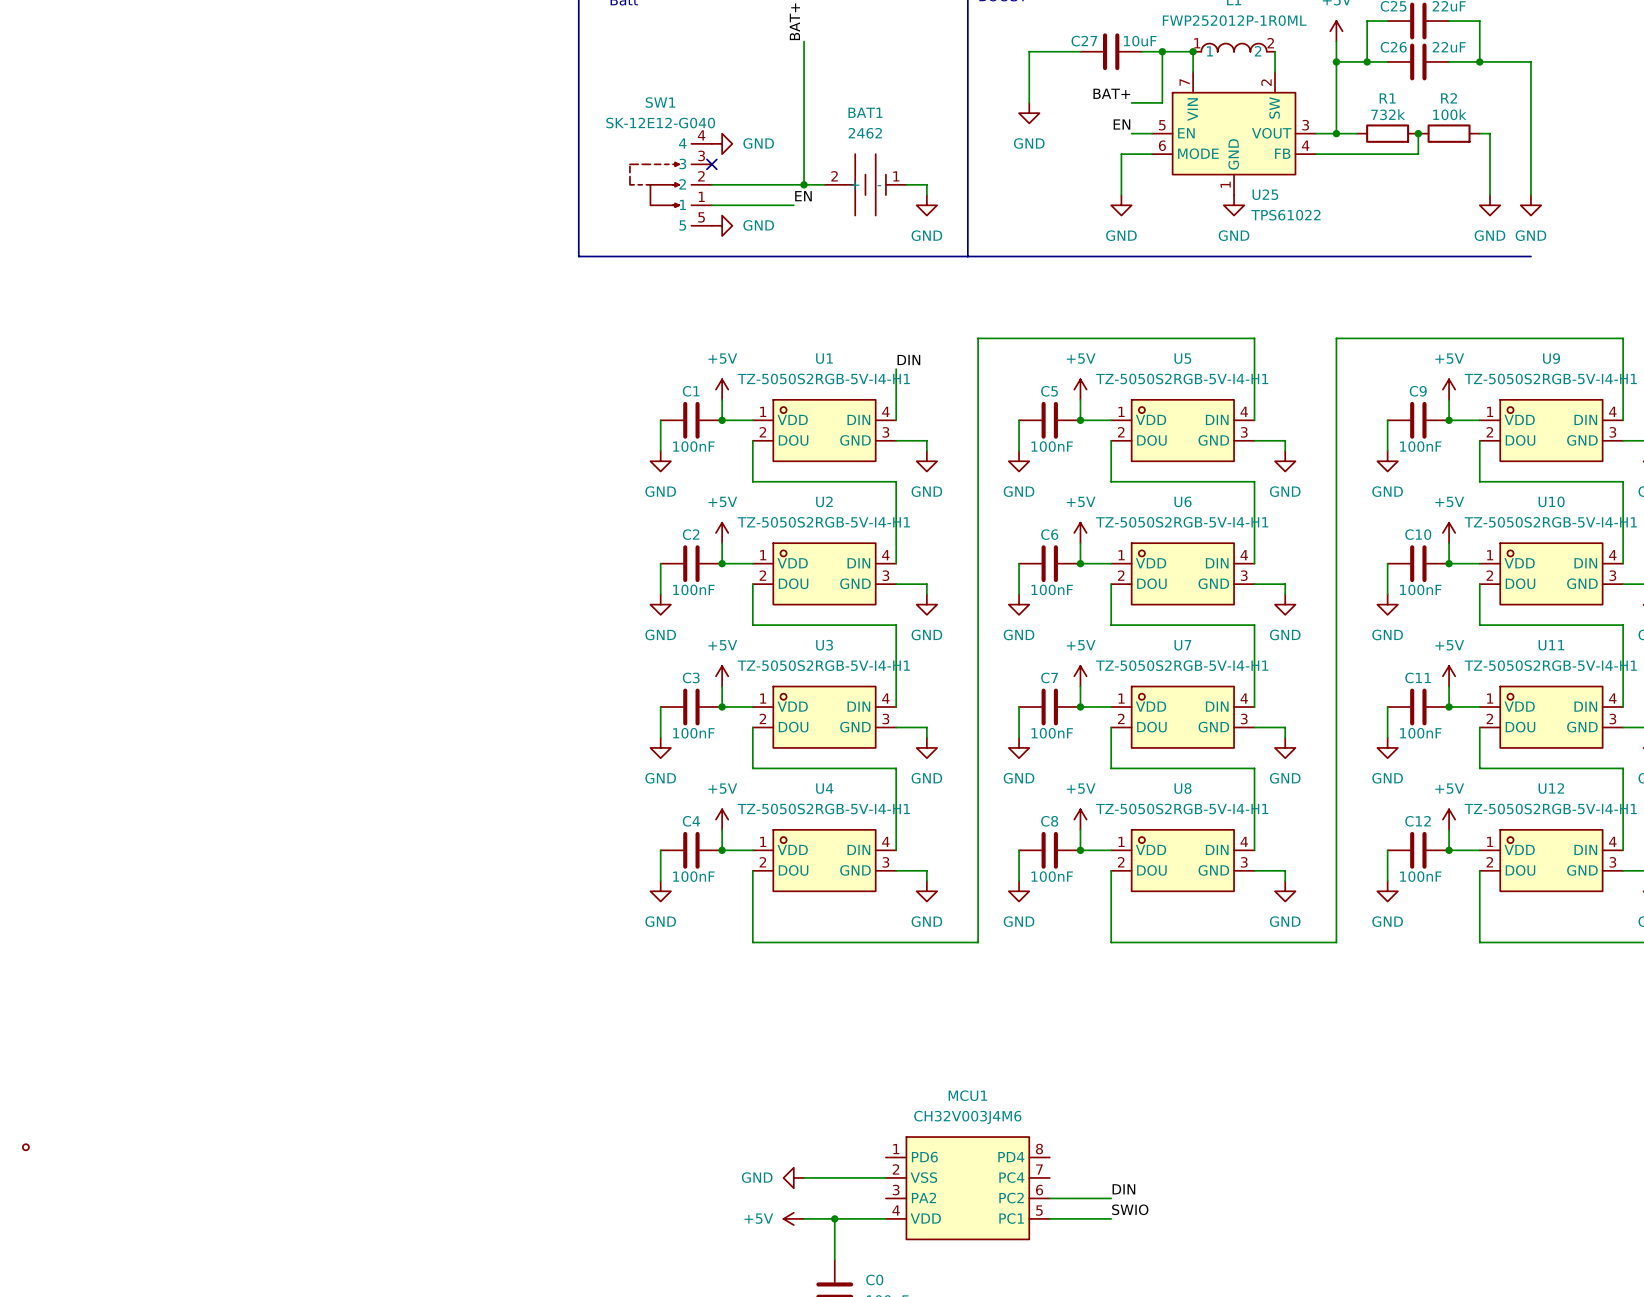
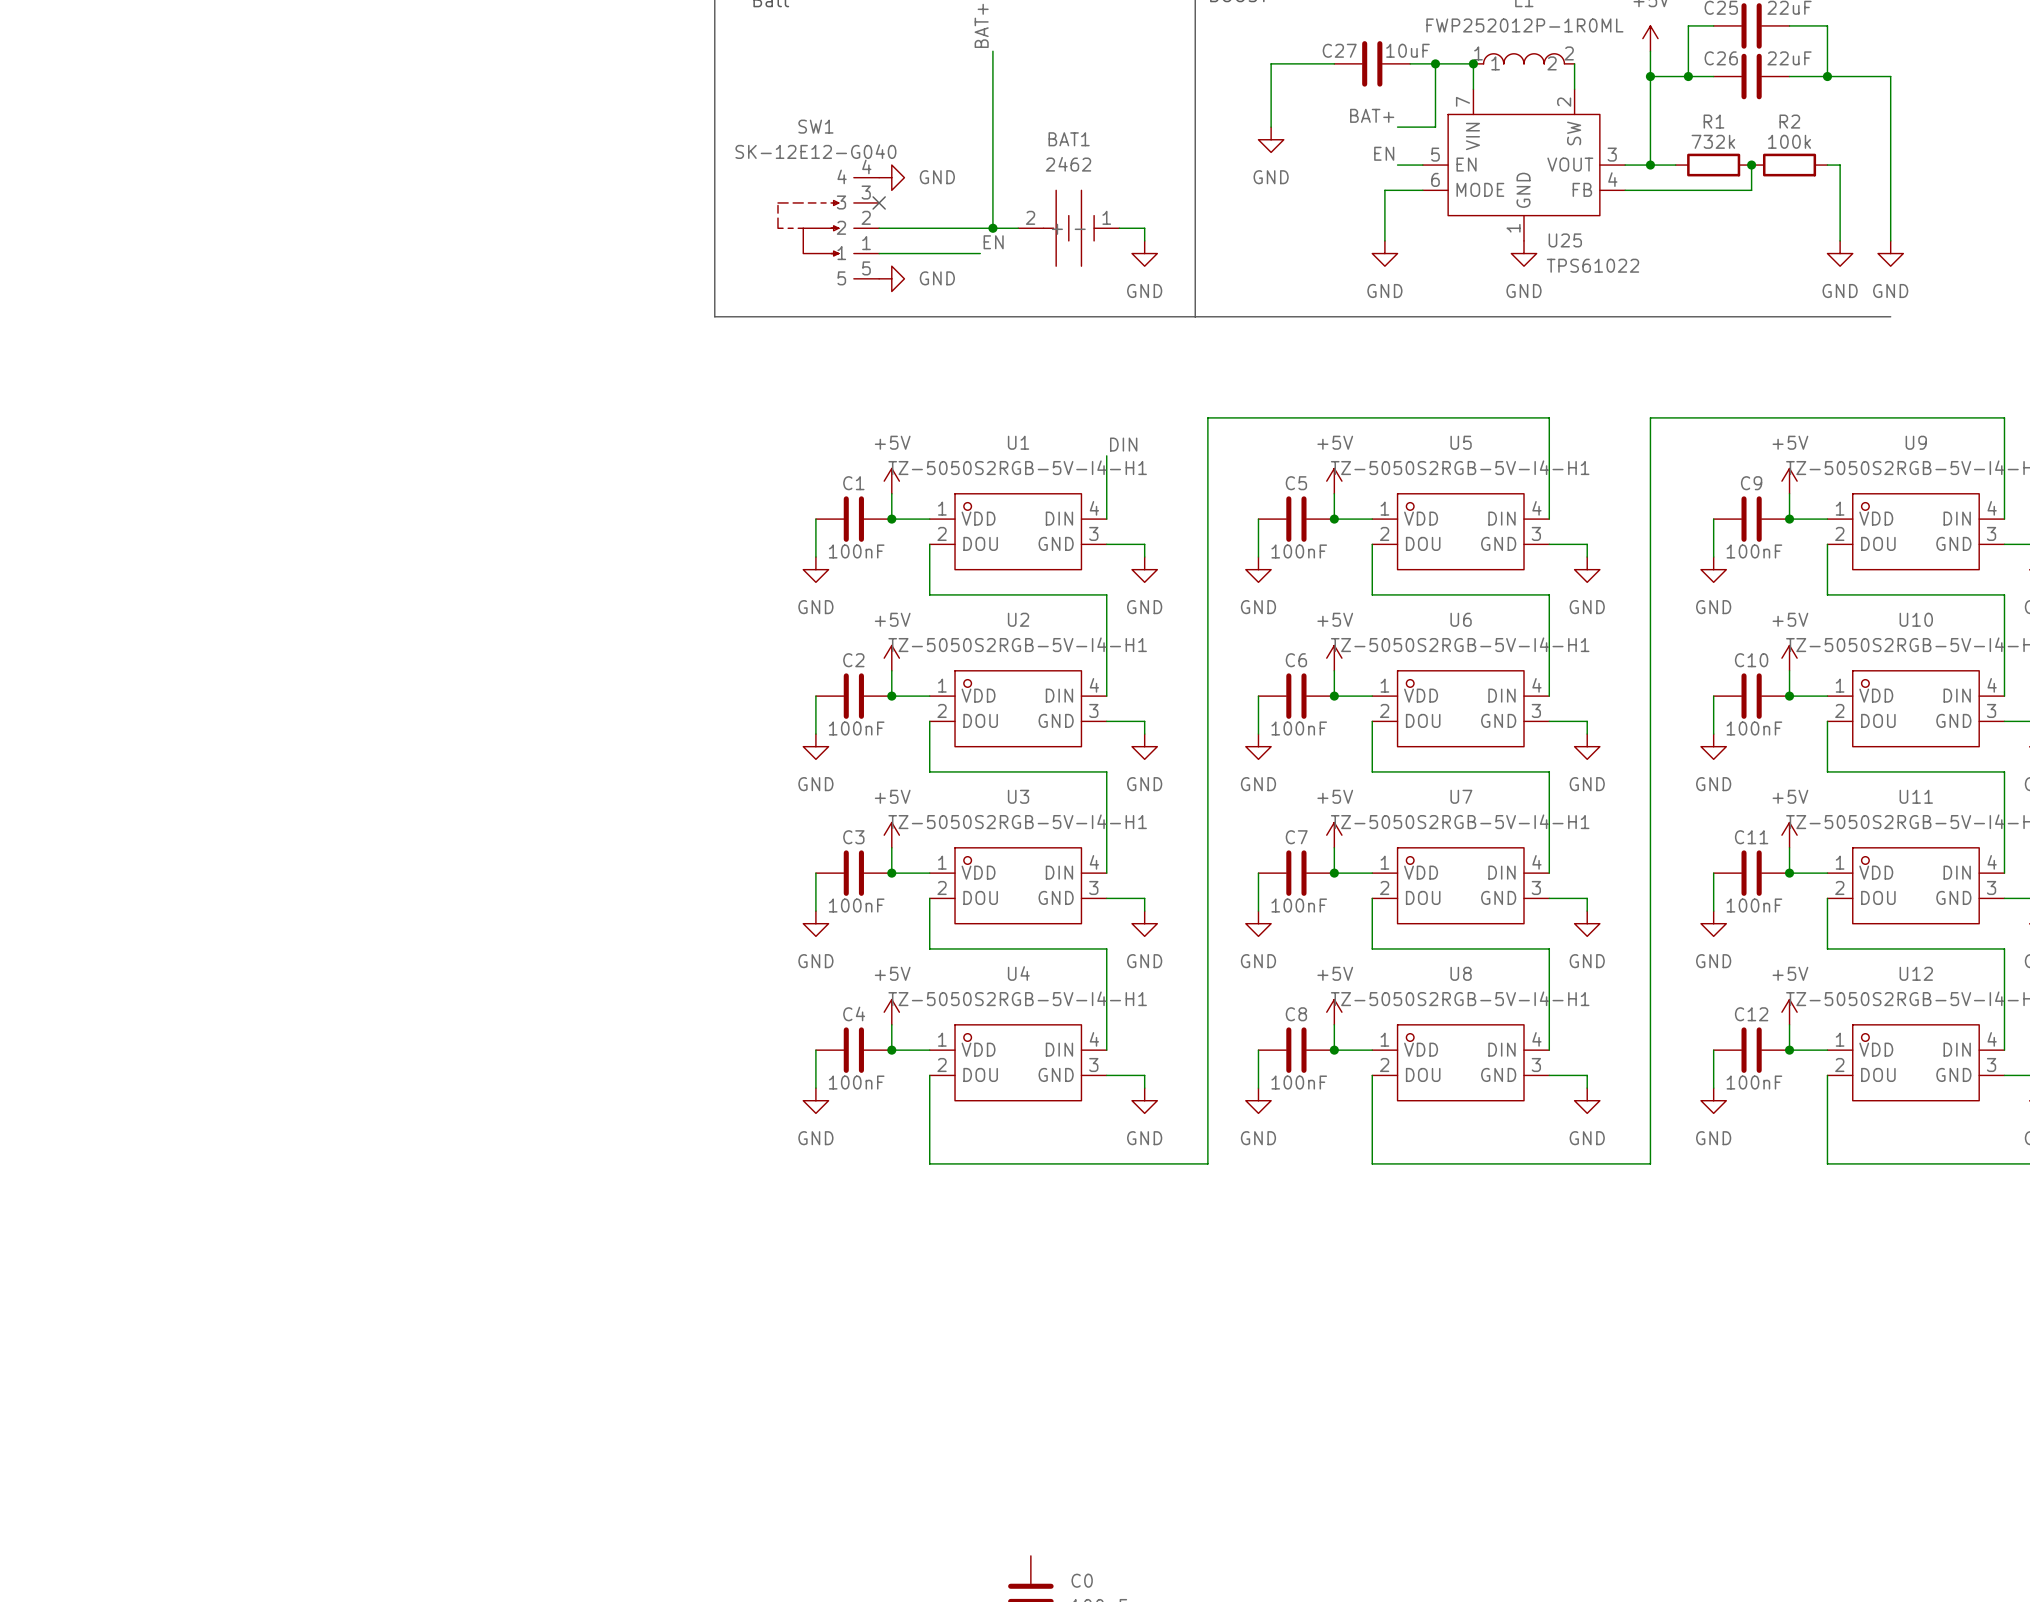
power symbol: GND (793, 1177) -> none
wire: (804, 1177) (885, 1177) -> none
MCU1: CH32V003J4M6 (536, 1188) -> none
label: DIN (1123, 1189) -> none
wire: (1049, 1198) (1111, 1198) -> none
label: SWIO (1130, 1209) -> none
power symbol: +5V (793, 1218) -> none
wire: (804, 1218) (885, 1218) -> none
wire: (834, 1218) (834, 1259) -> none
junction: (834, 1218) -> none
wire: (1049, 1218) (1111, 1218) -> none

